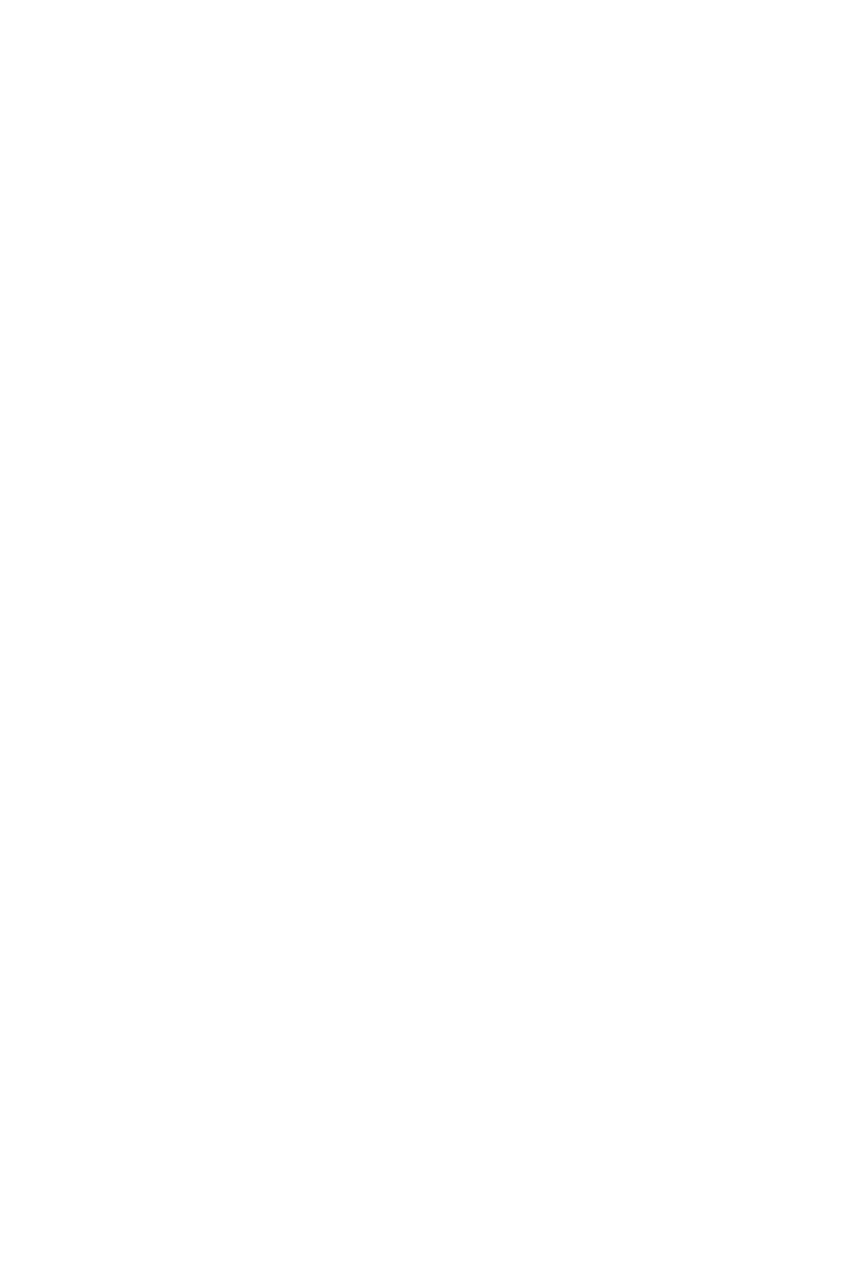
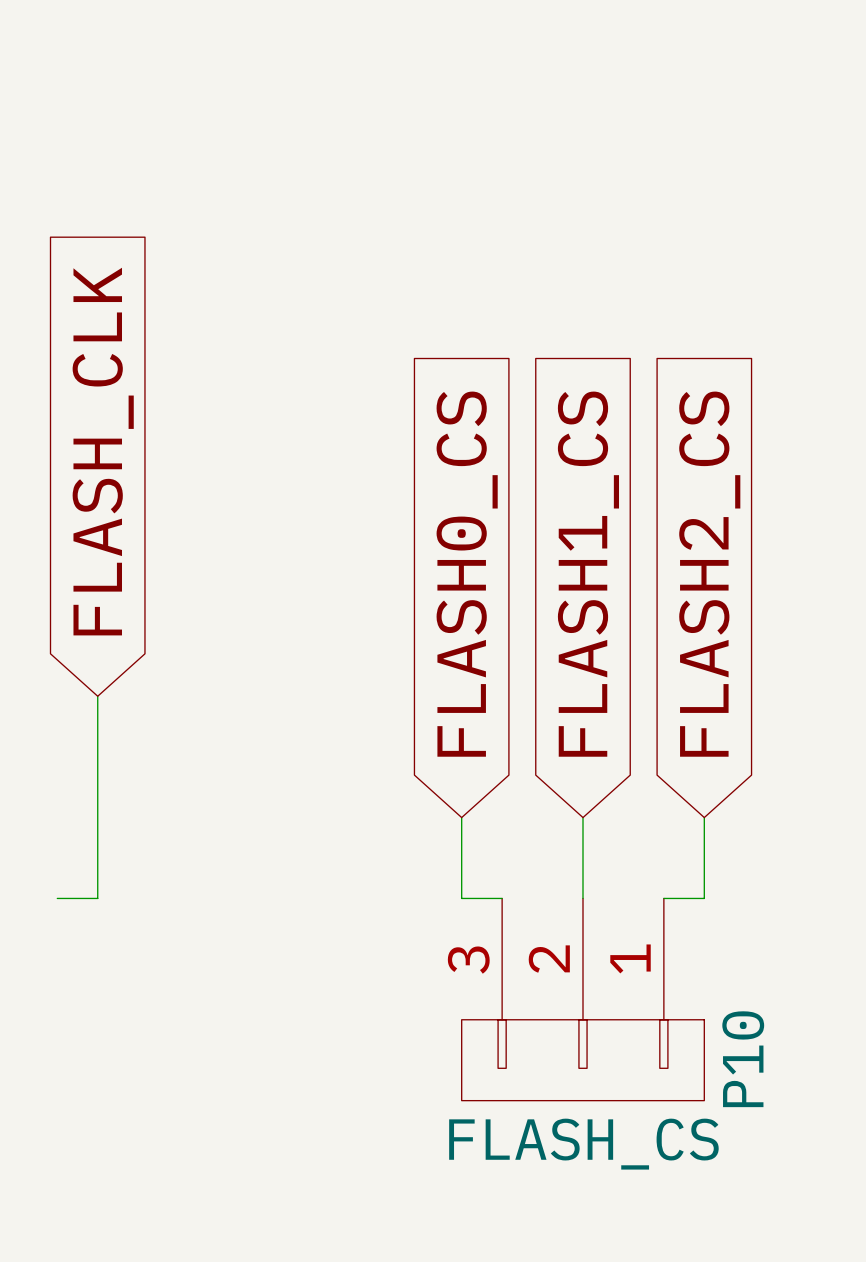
global label: none -> FLASH_CLK (103, 451)
global label: none -> FLASH0_CS (467, 574)
global label: none -> FLASH1_CS (588, 574)
global label: none -> FLASH2_CS (709, 574)
wire: none -> (97, 696) (97, 898) (57, 898)
wire: none -> (461, 817) (461, 898) (502, 898)
wire: none -> (582, 817) (582, 898)
wire: none -> (704, 817) (704, 898) (663, 898)
P10: none -> FLASH_CS (582, 999)

